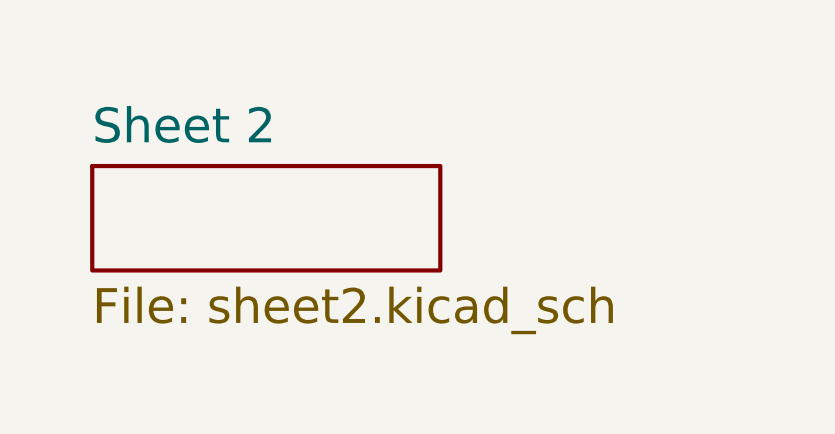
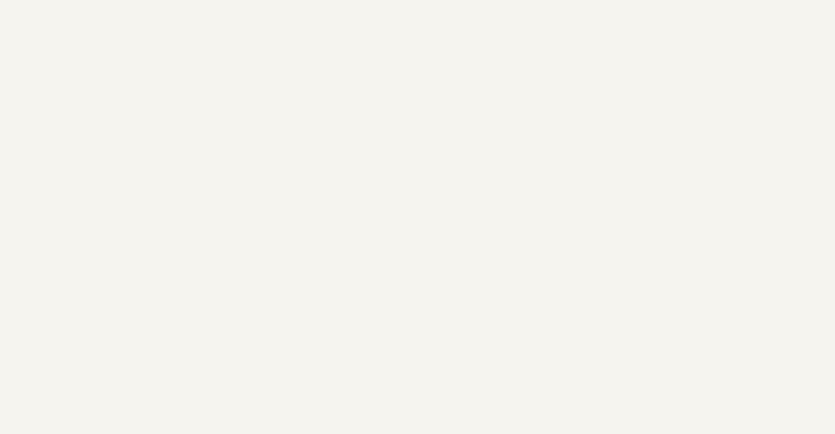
sheet Sheet 2: File: sheet2.kicad_sch (266, 218) -> none

